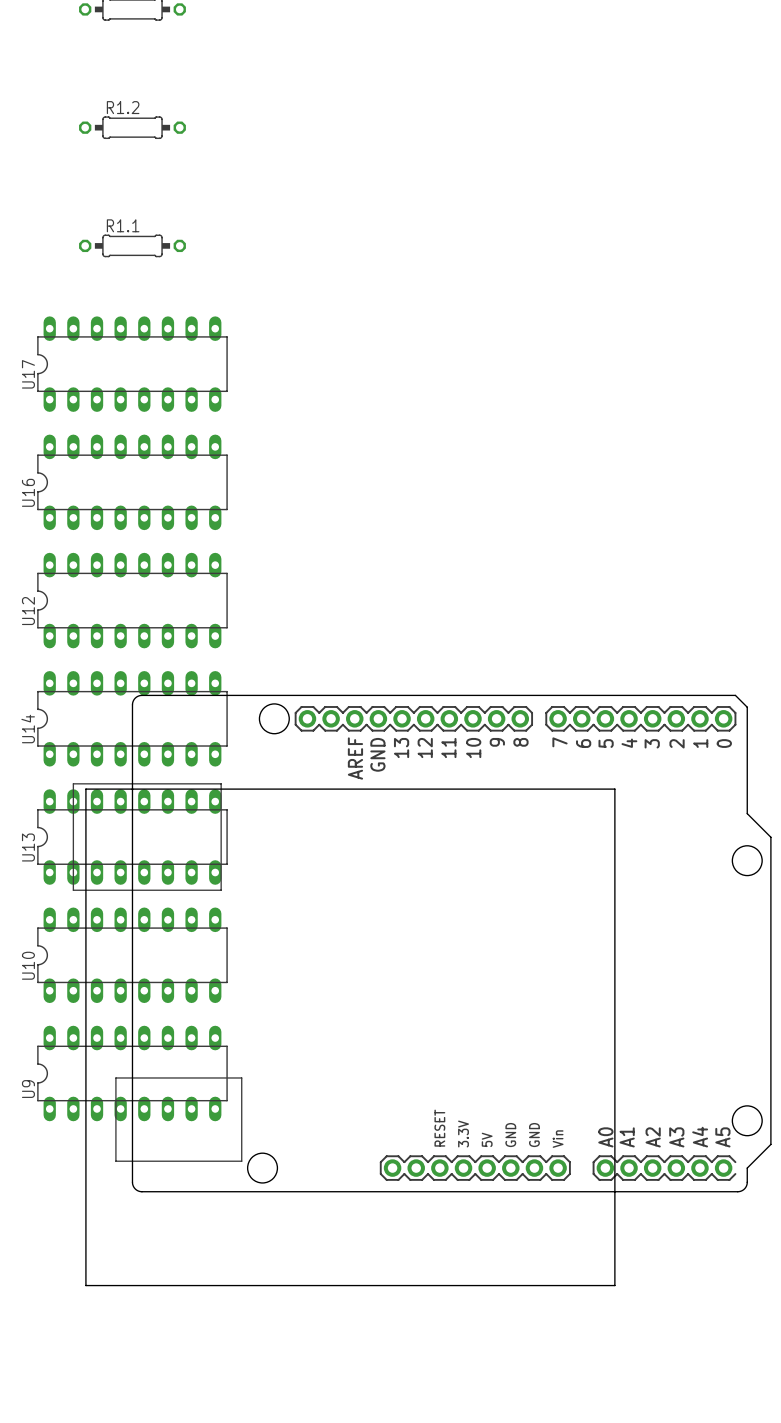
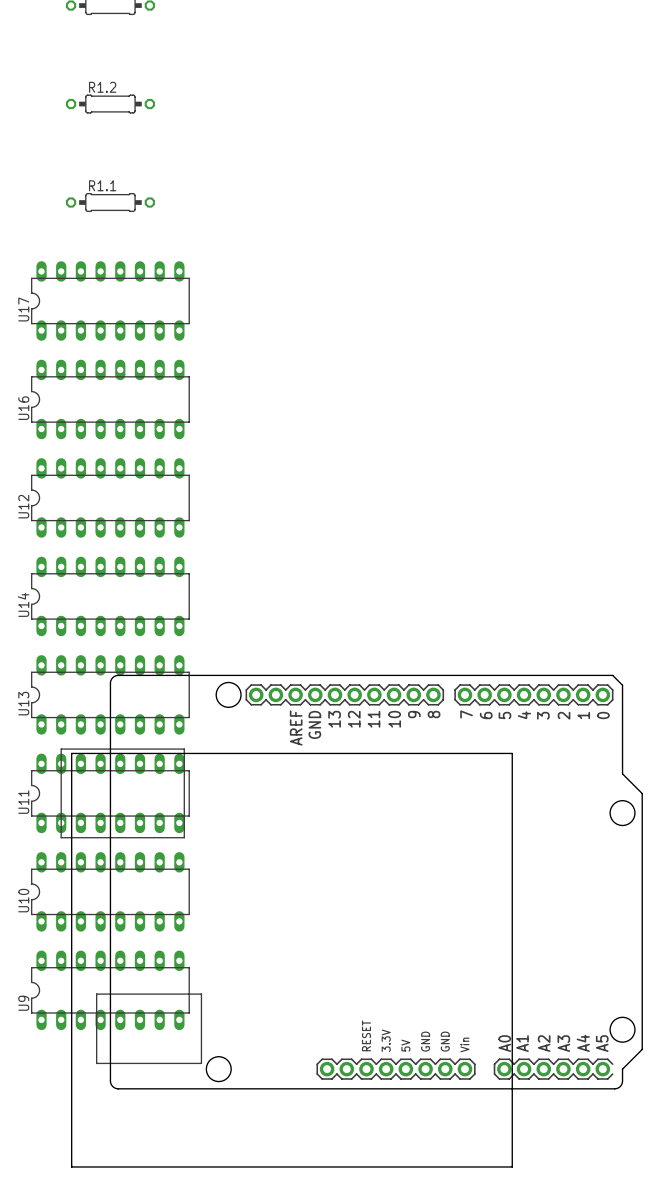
board edge: (85, 907) (85, 789) (614, 789) (614, 907) -> (71, 753) (512, 753)
part position: (422, 943) -> (351, 882)
U10 name: U10 (28, 965) -> U11 (23, 802)
U9 name: U9 (28, 1089) -> U10 (23, 900)
U9: none -> (110, 990)
board edge: (85, 1285) (614, 1285) -> (71, 1068) (71, 1166) (512, 1166) (512, 1068)

